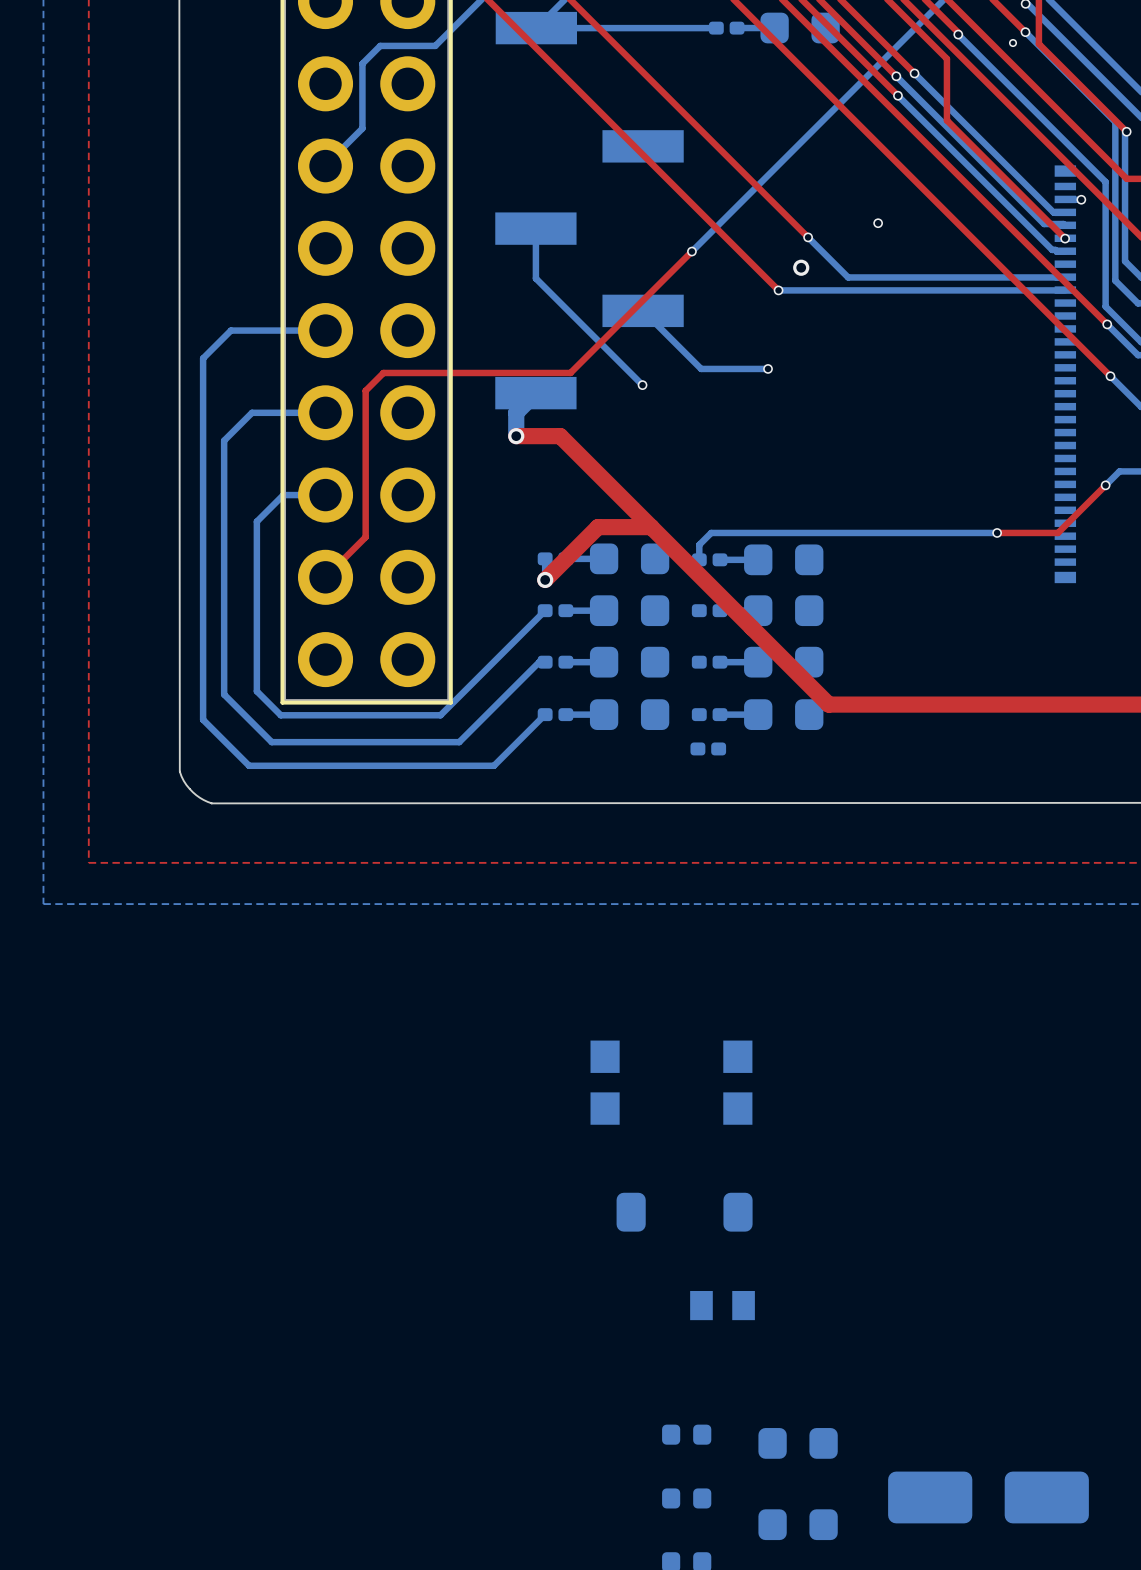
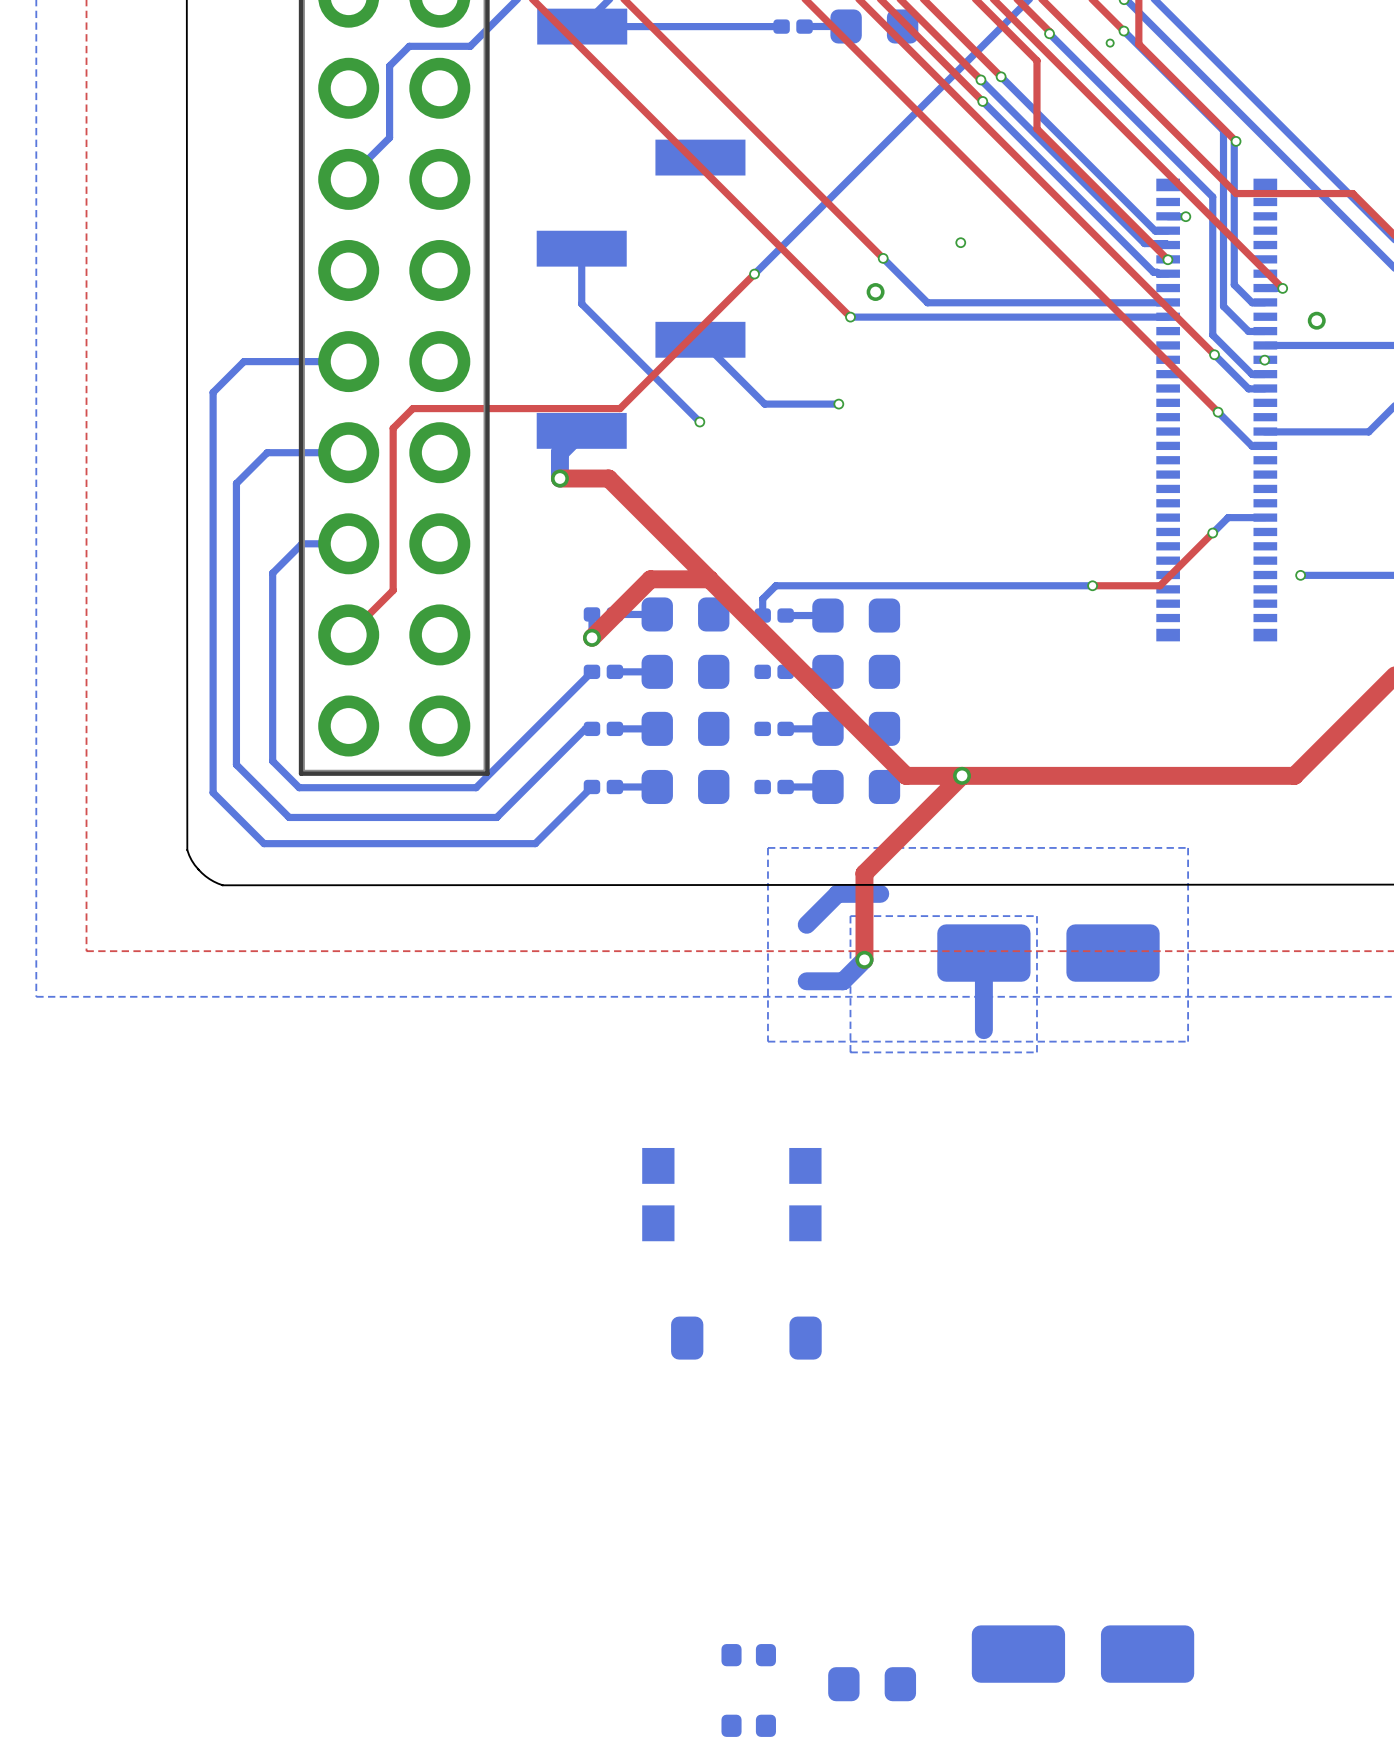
top track: none -> (962, 775) (864, 873) (864, 959)
via: none -> (962, 775)
part: (708, 748) -> none
bottom zone outline: none -> (767, 847) (1188, 847) (1188, 1041) (767, 1041) (767, 847)
bottom track: none -> (880, 893) (837, 893) (806, 924)
bottom zone outline: none -> (850, 916) (1036, 916) (1036, 1052) (850, 1052) (850, 916)
bottom track: none -> (983, 953) (983, 1030)
part: none -> (1048, 953)
bottom track: none -> (864, 959) (843, 981) (806, 981)
via: none -> (864, 959)
part: (722, 1305) -> none
part: (686, 1434) -> none
part: (798, 1443) -> none

